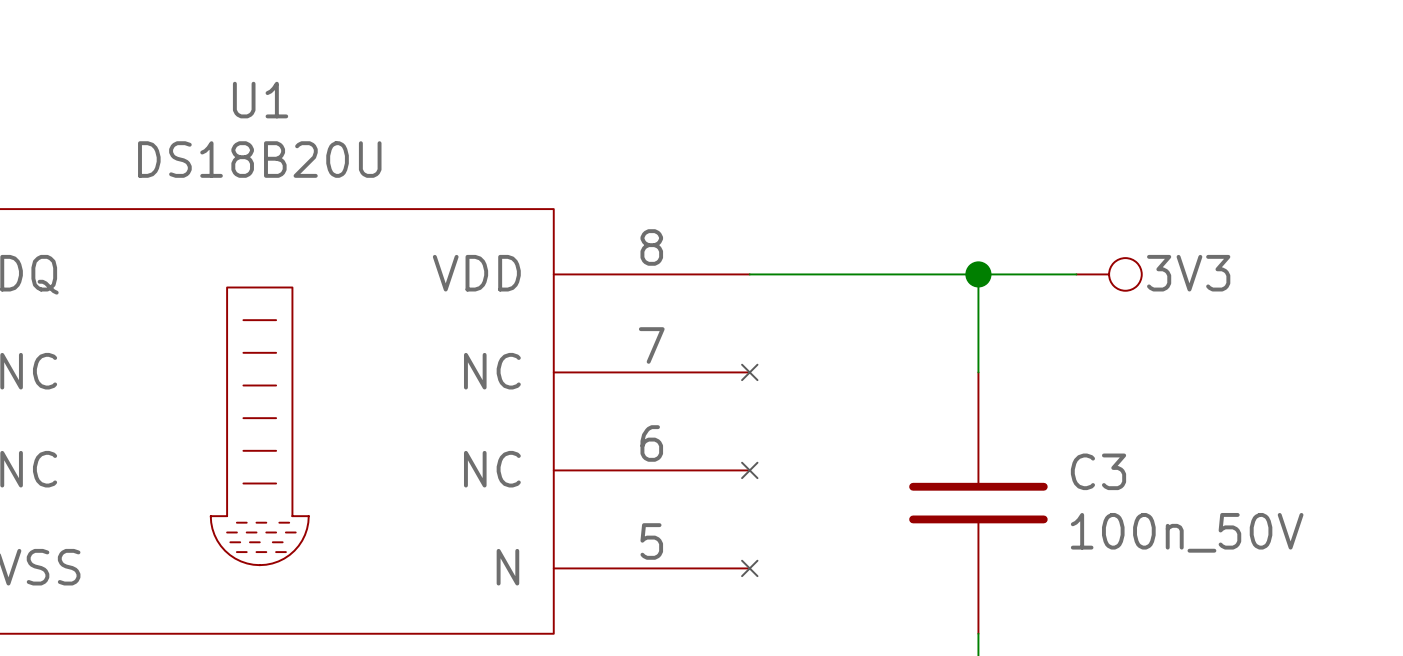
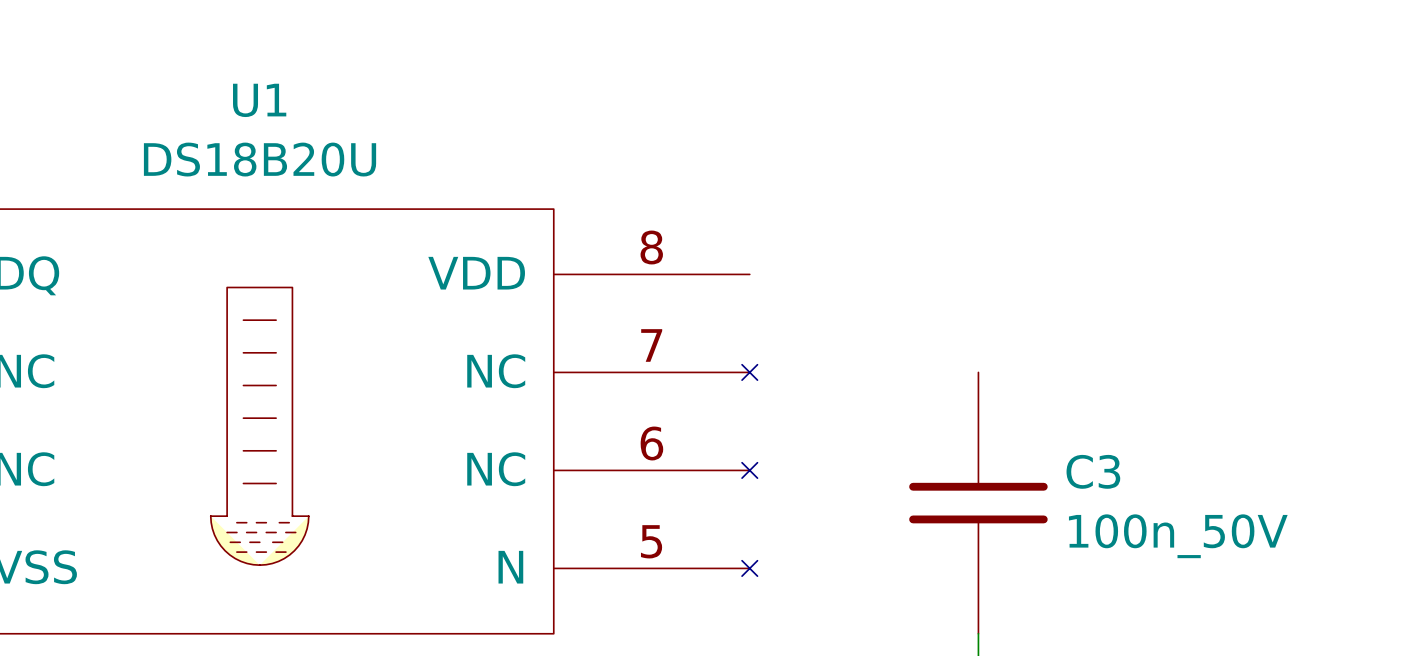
wire: (749, 274) (1076, 274) -> none
wire: (978, 274) (978, 372) -> none
junction: (978, 274) -> none
power symbol: 3V3 (1109, 274) -> none

